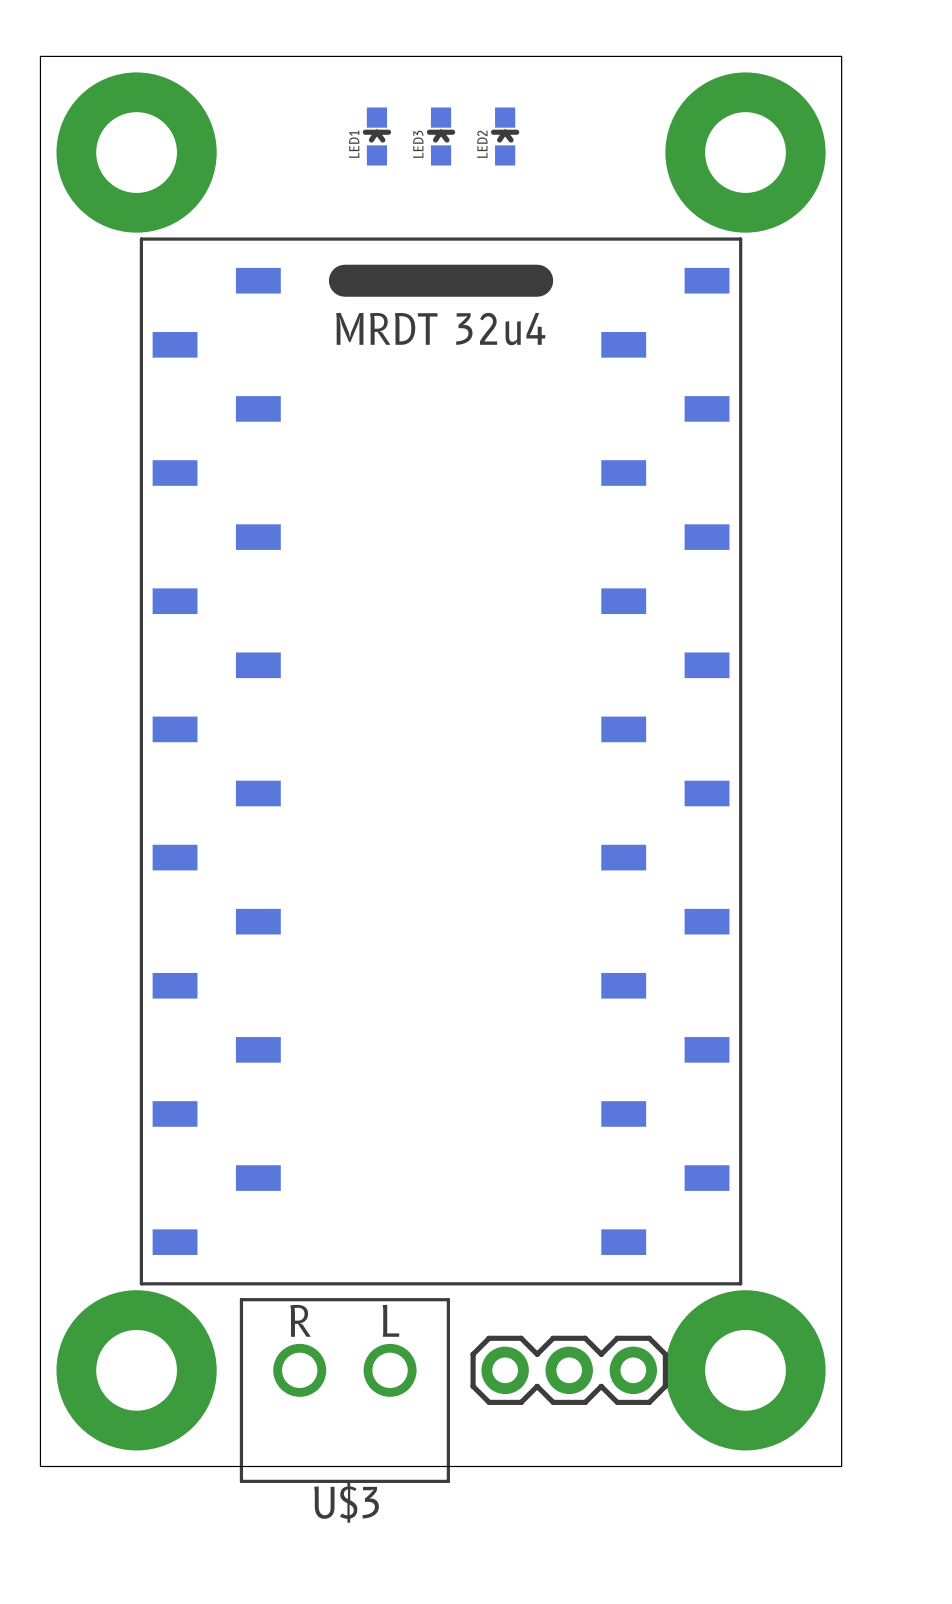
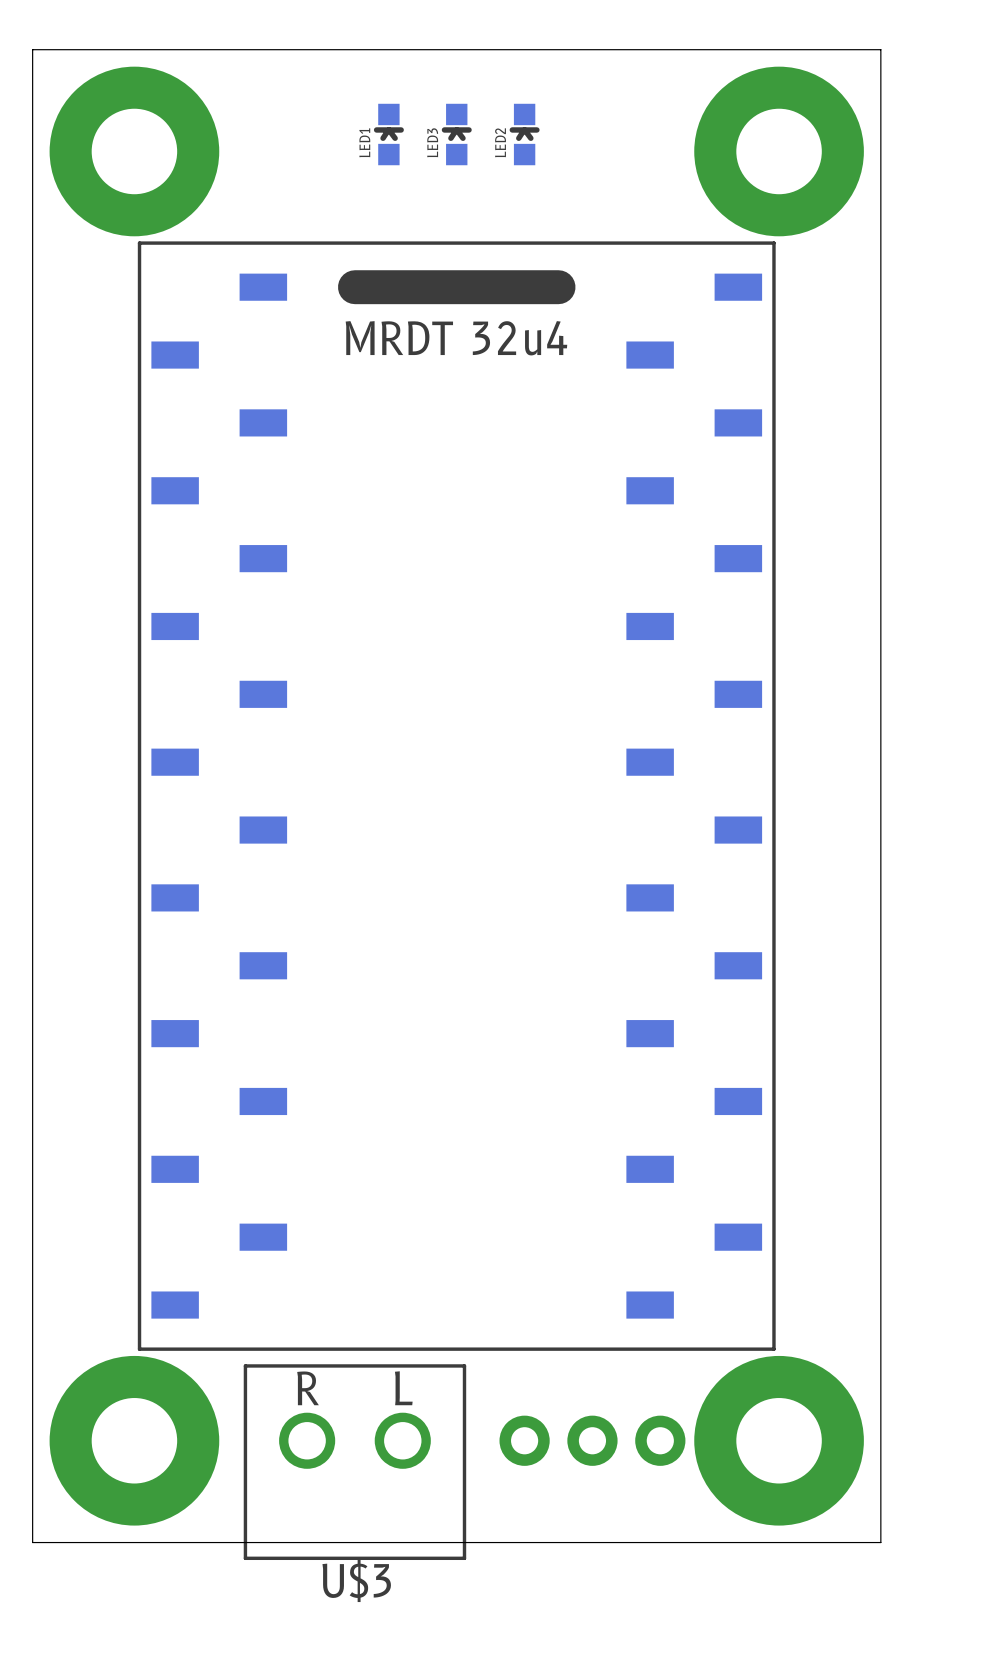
part side: bottom (569, 1370) -> top (592, 1440)

